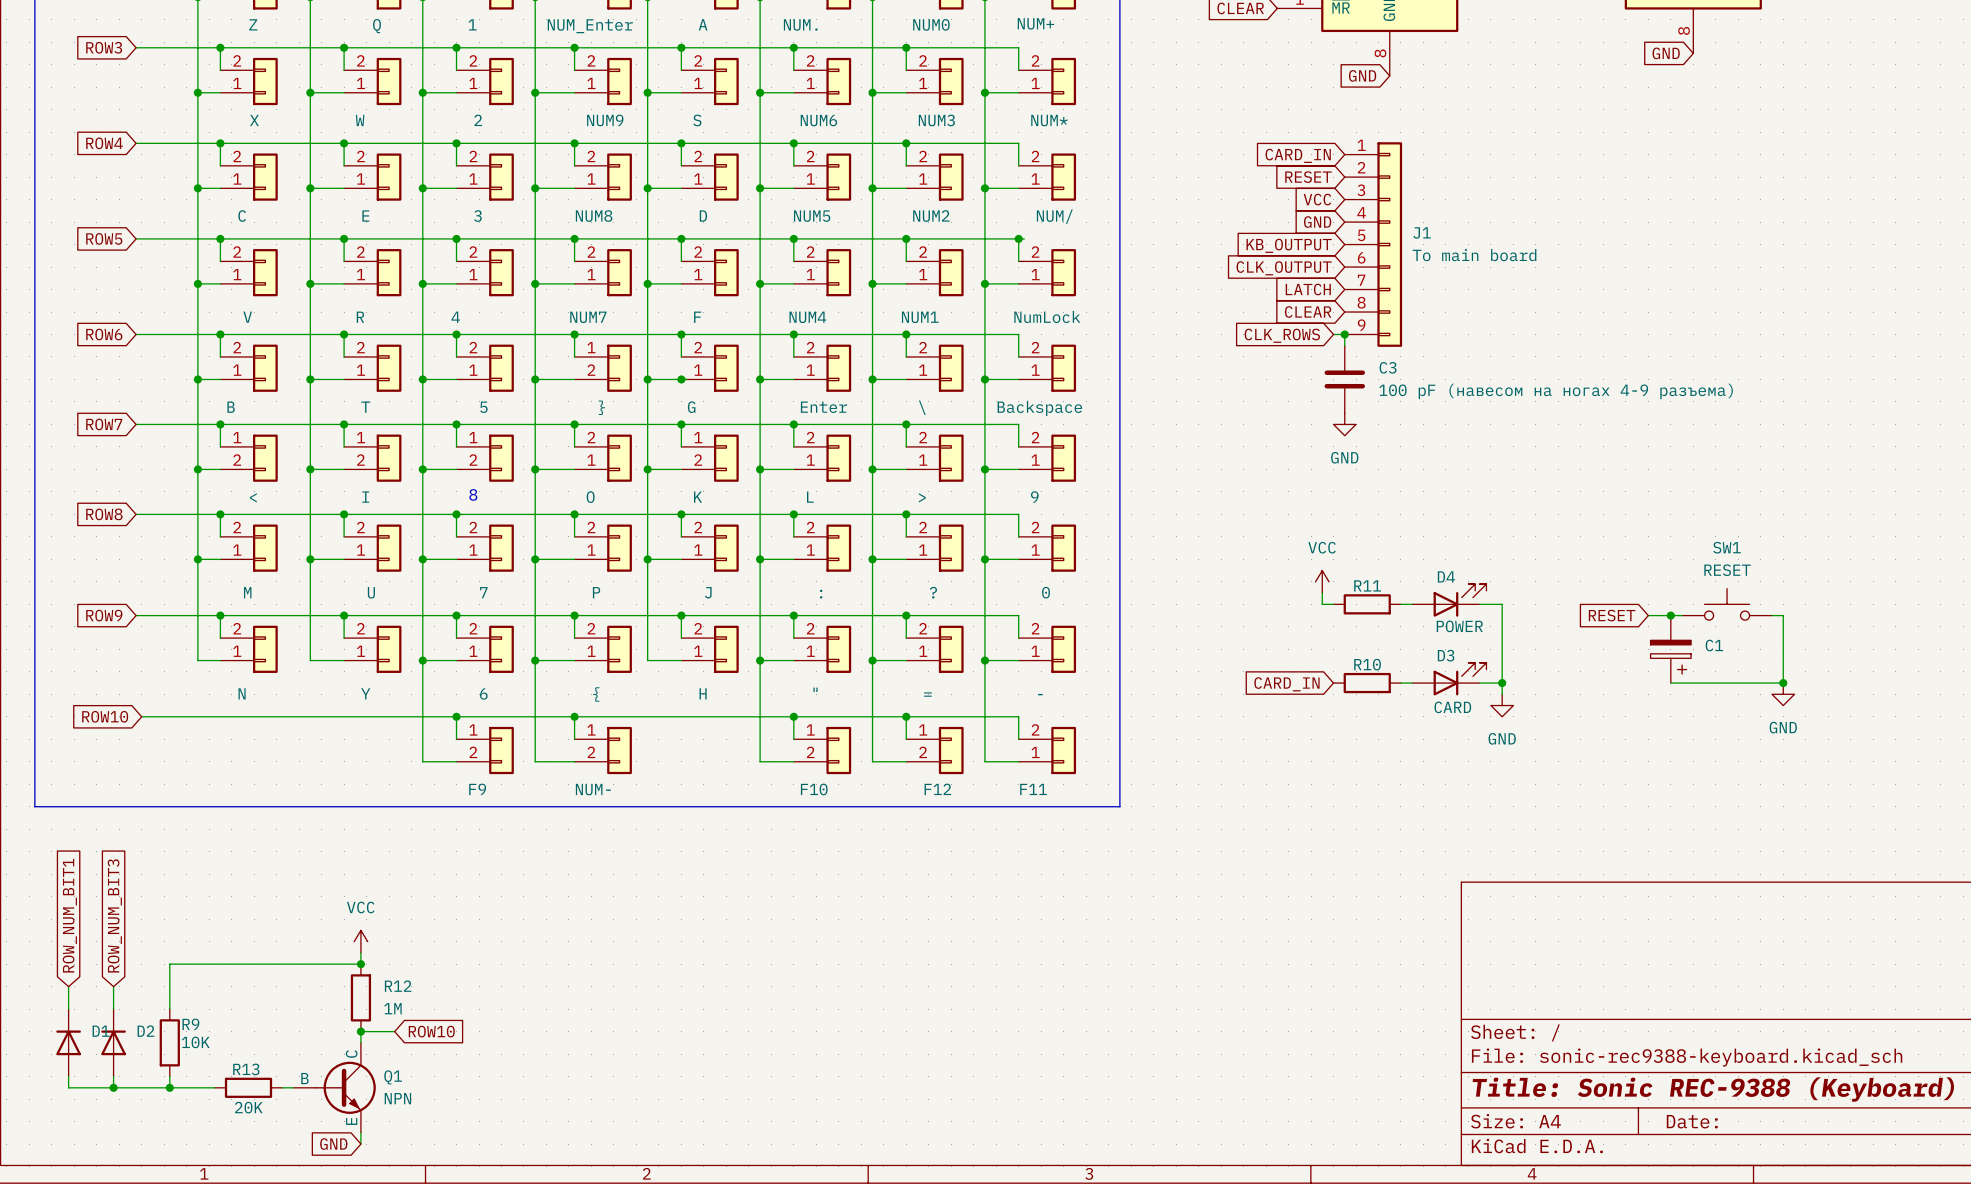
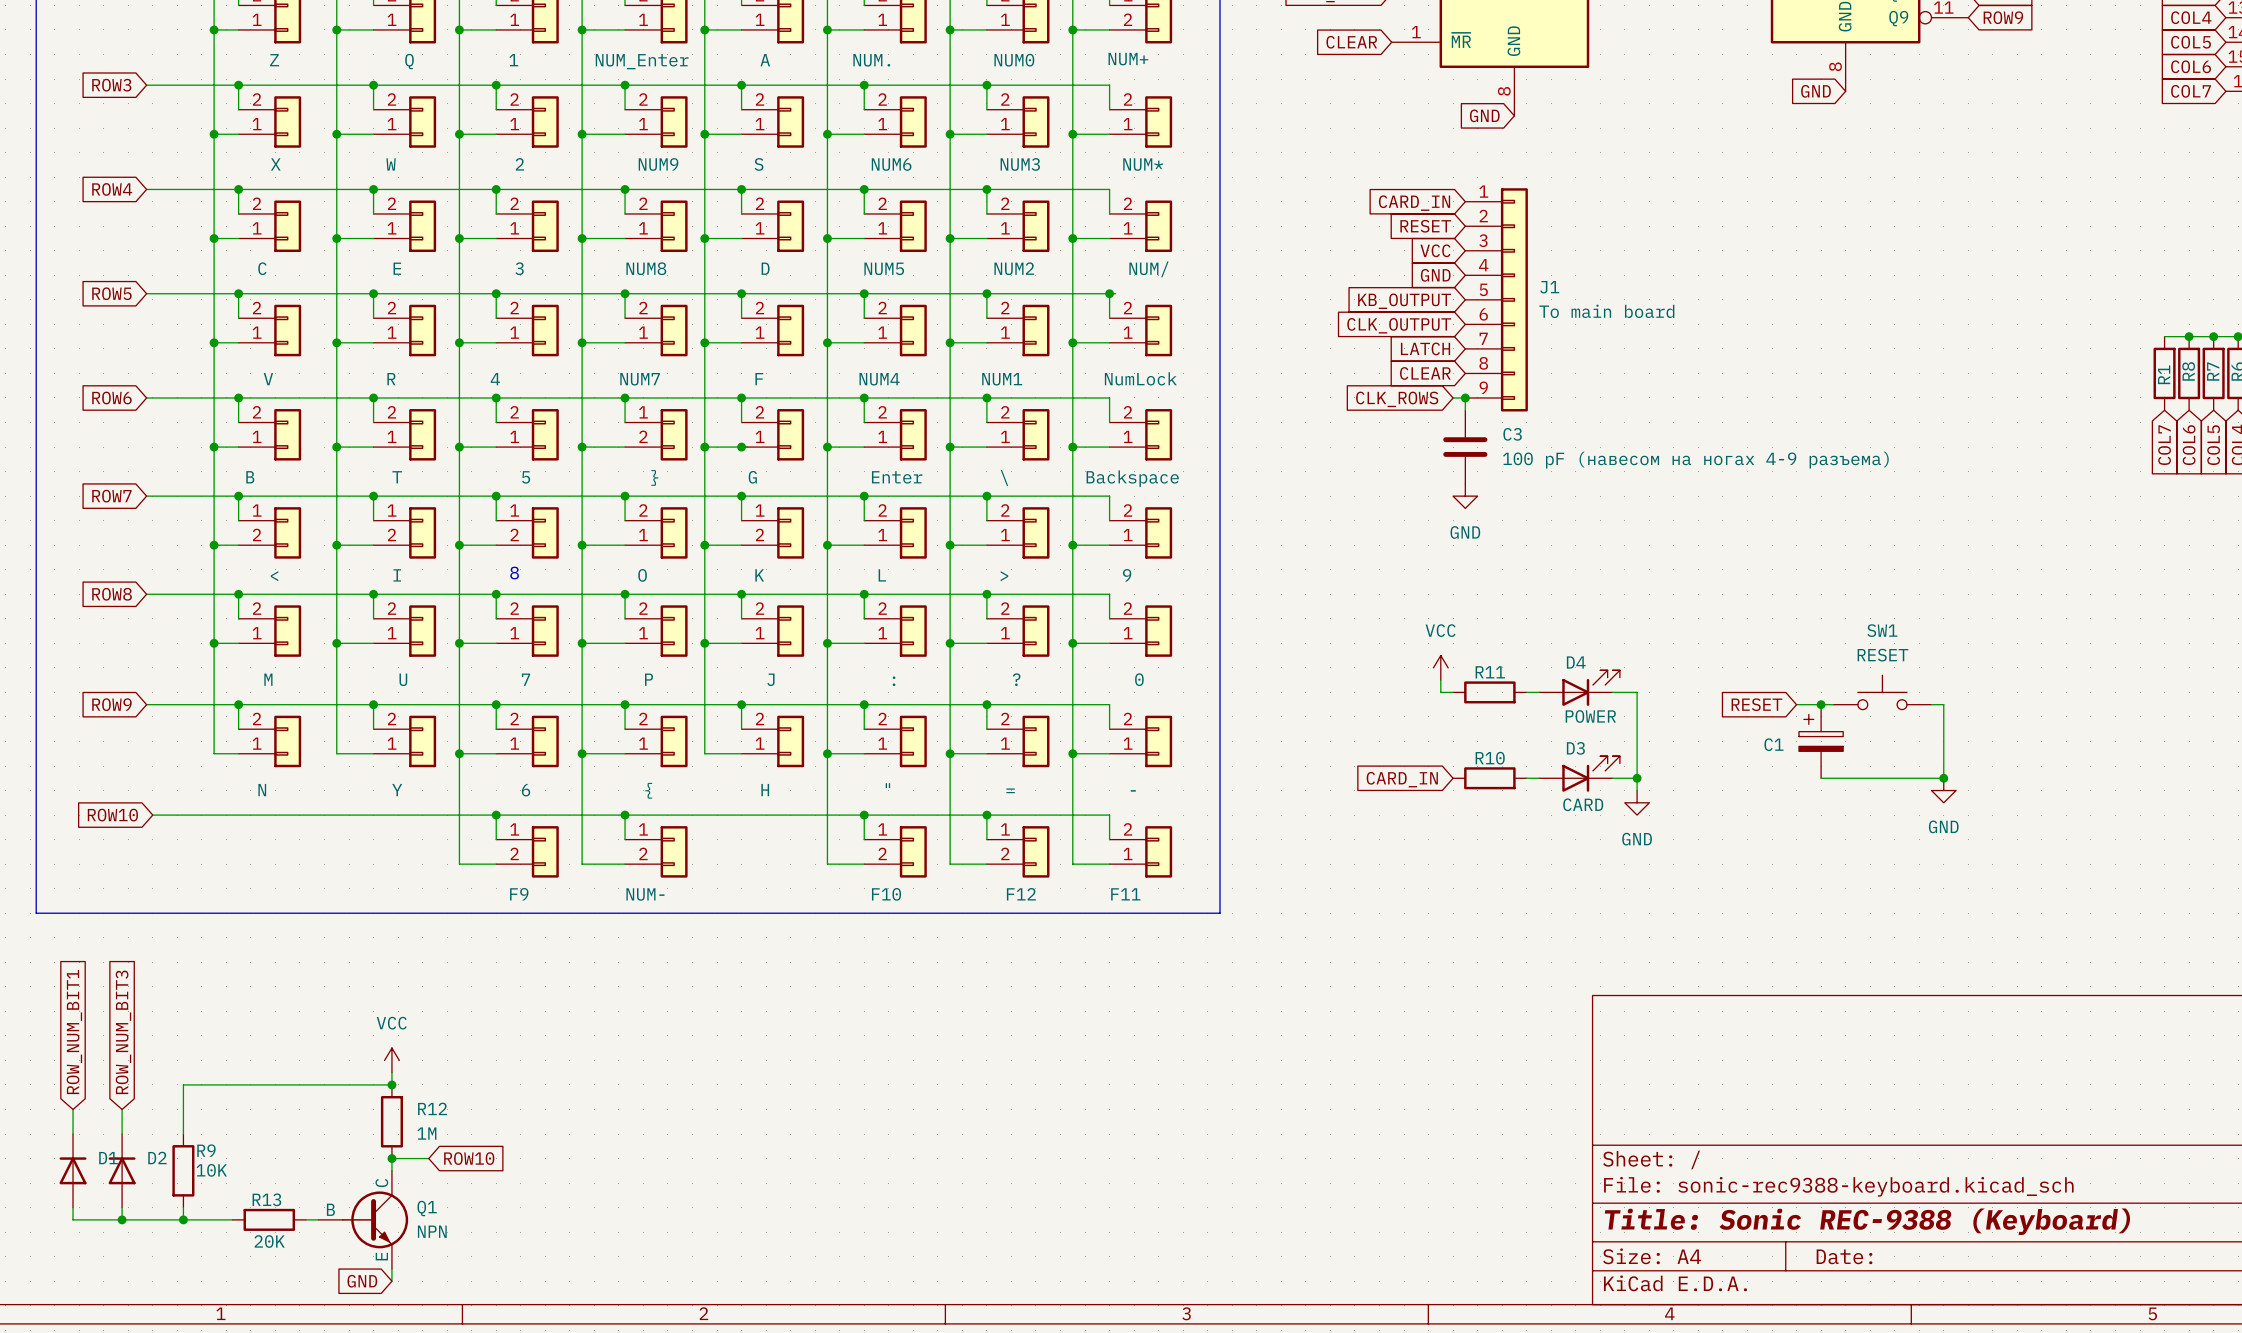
C1 rotation: 0° (1670, 657) -> 180° (1821, 732)

